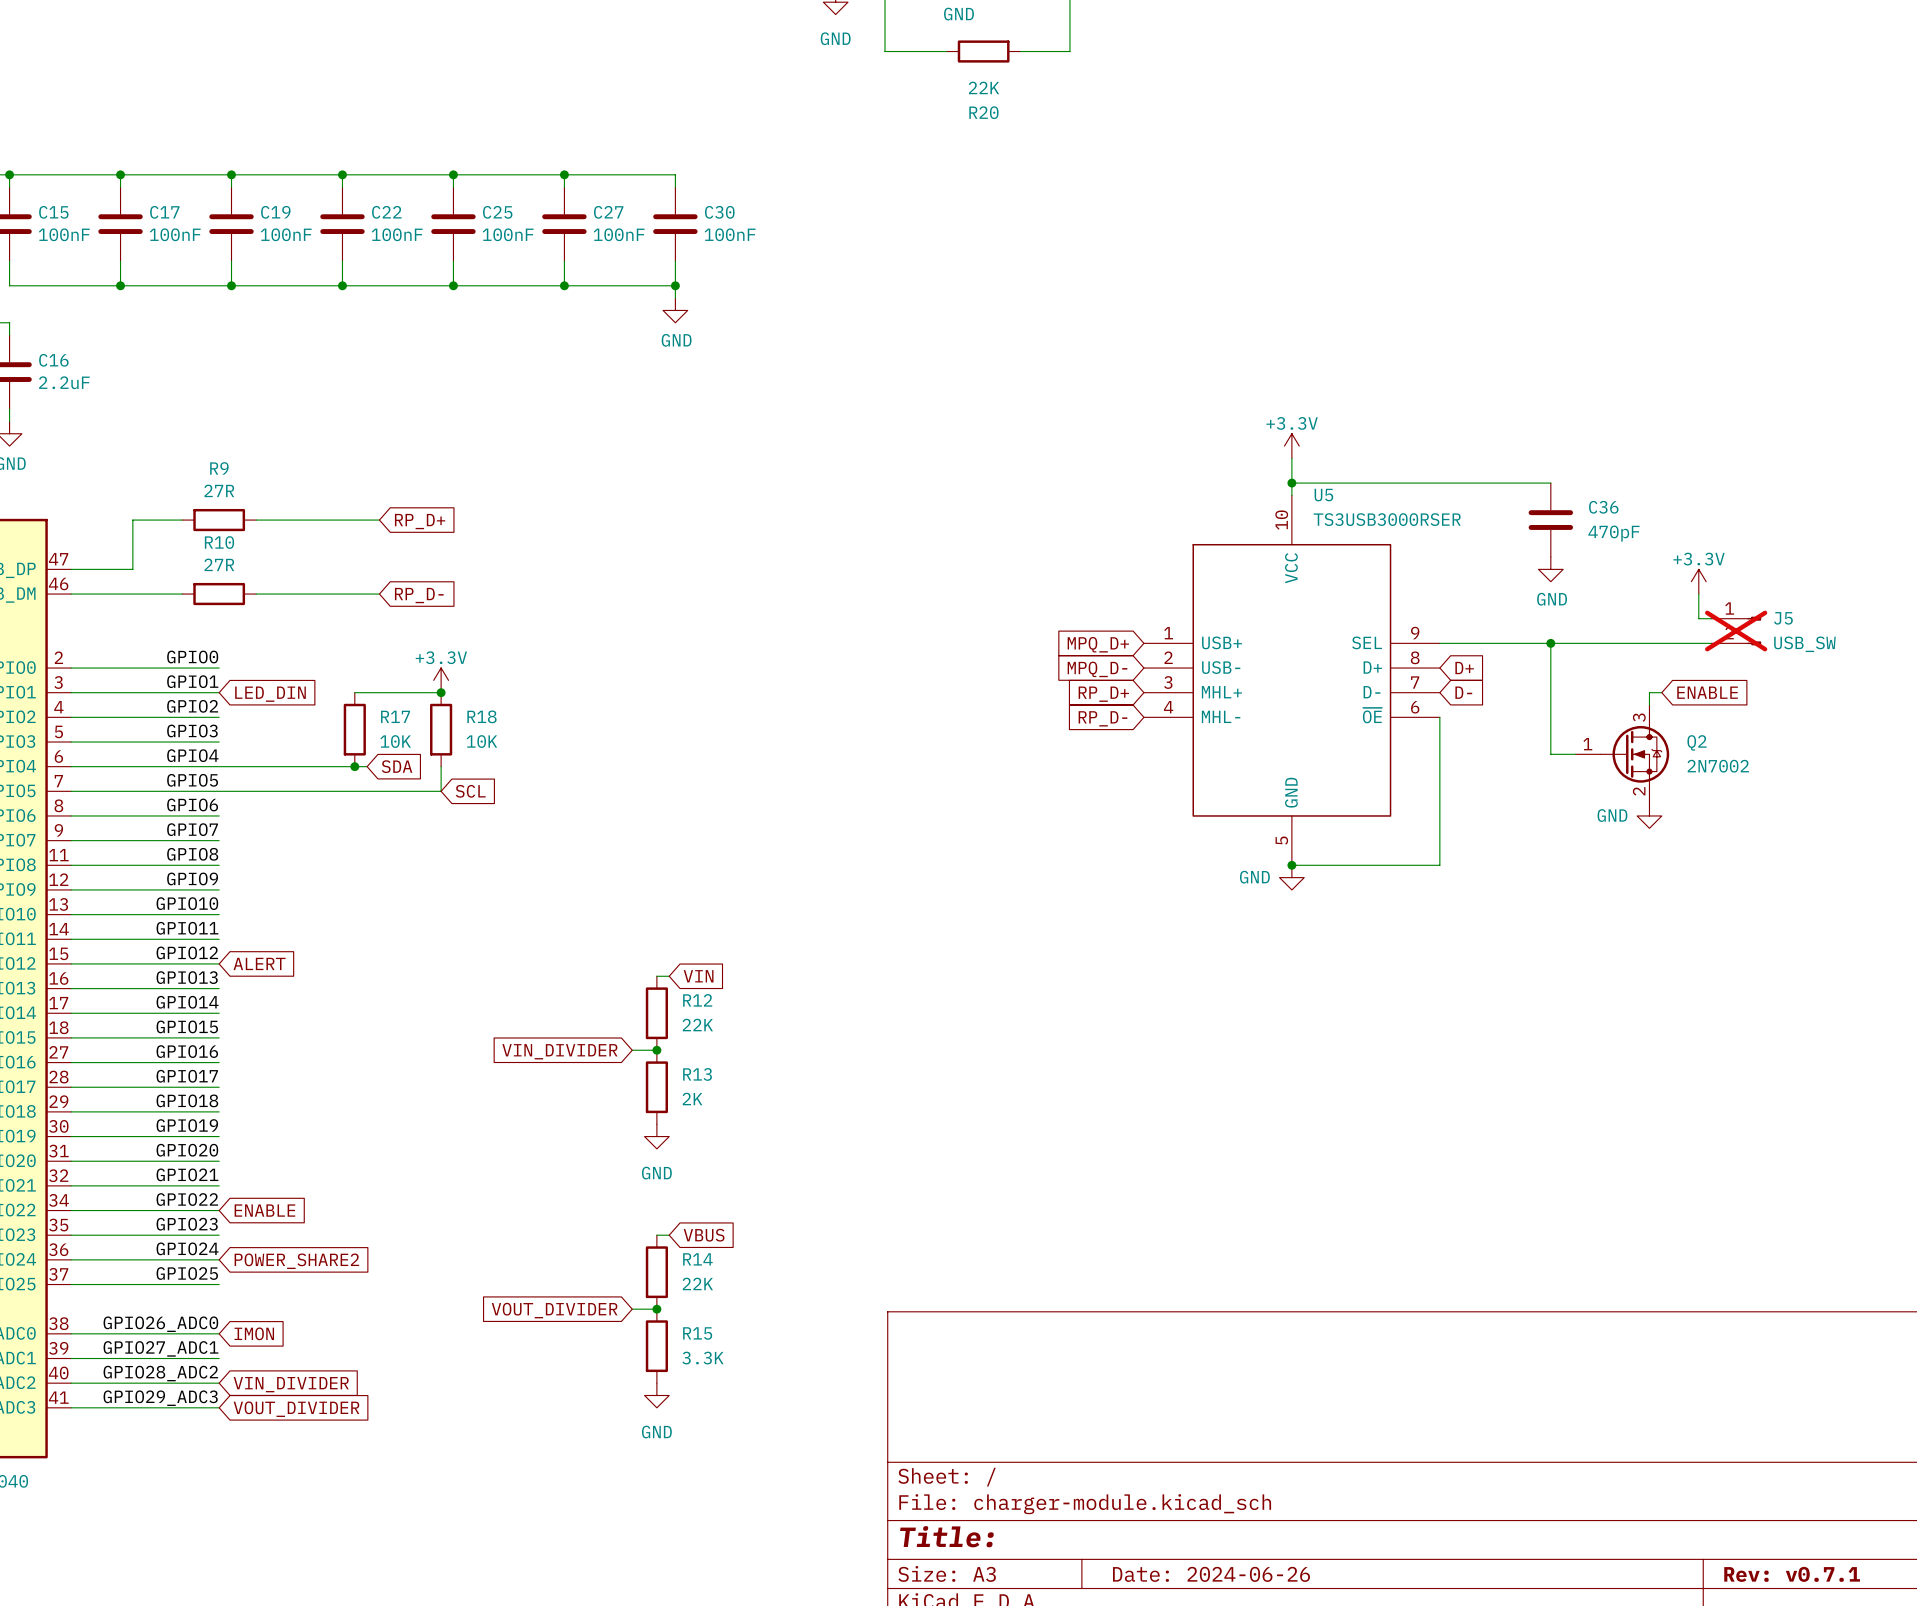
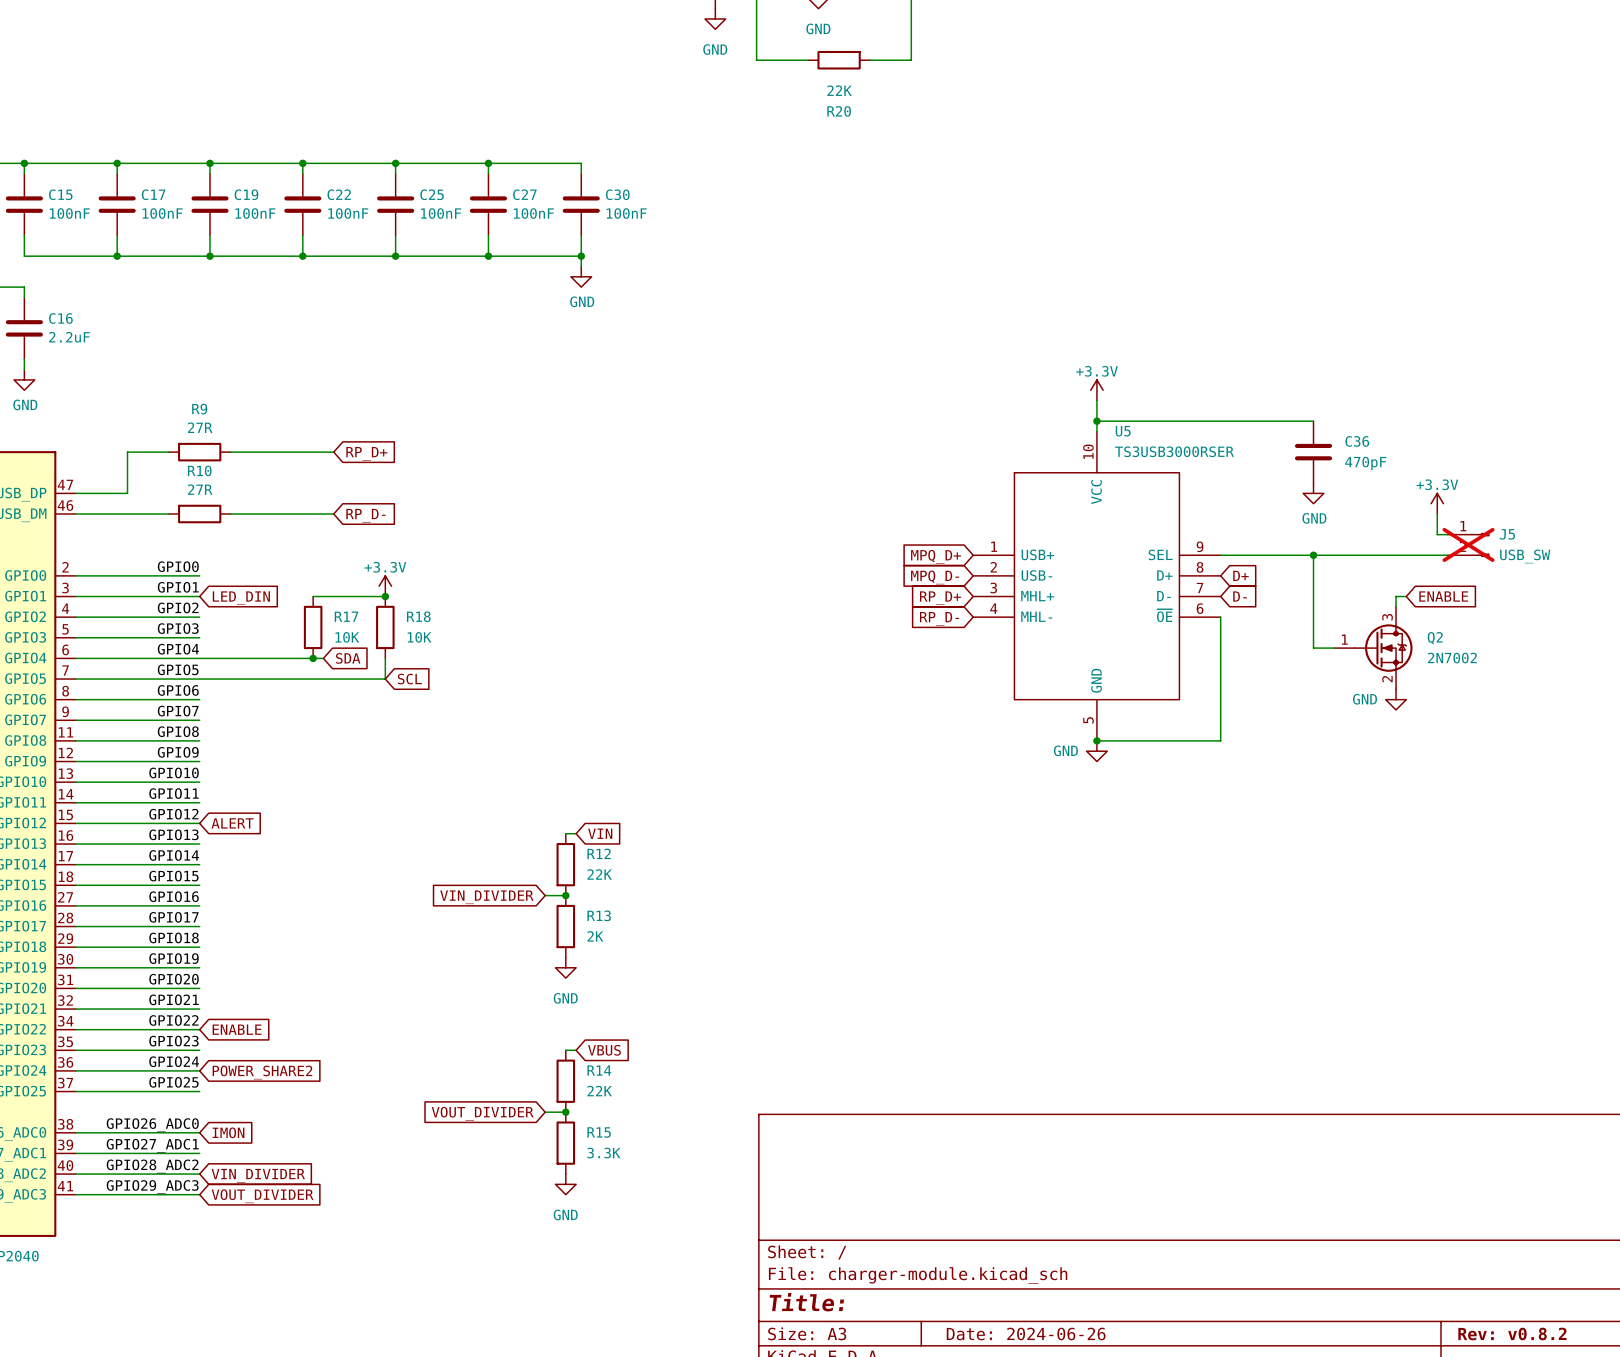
title block: Rev: v0.7.1 (1792, 1574) -> Rev: v0.8.2 (1512, 1333)

